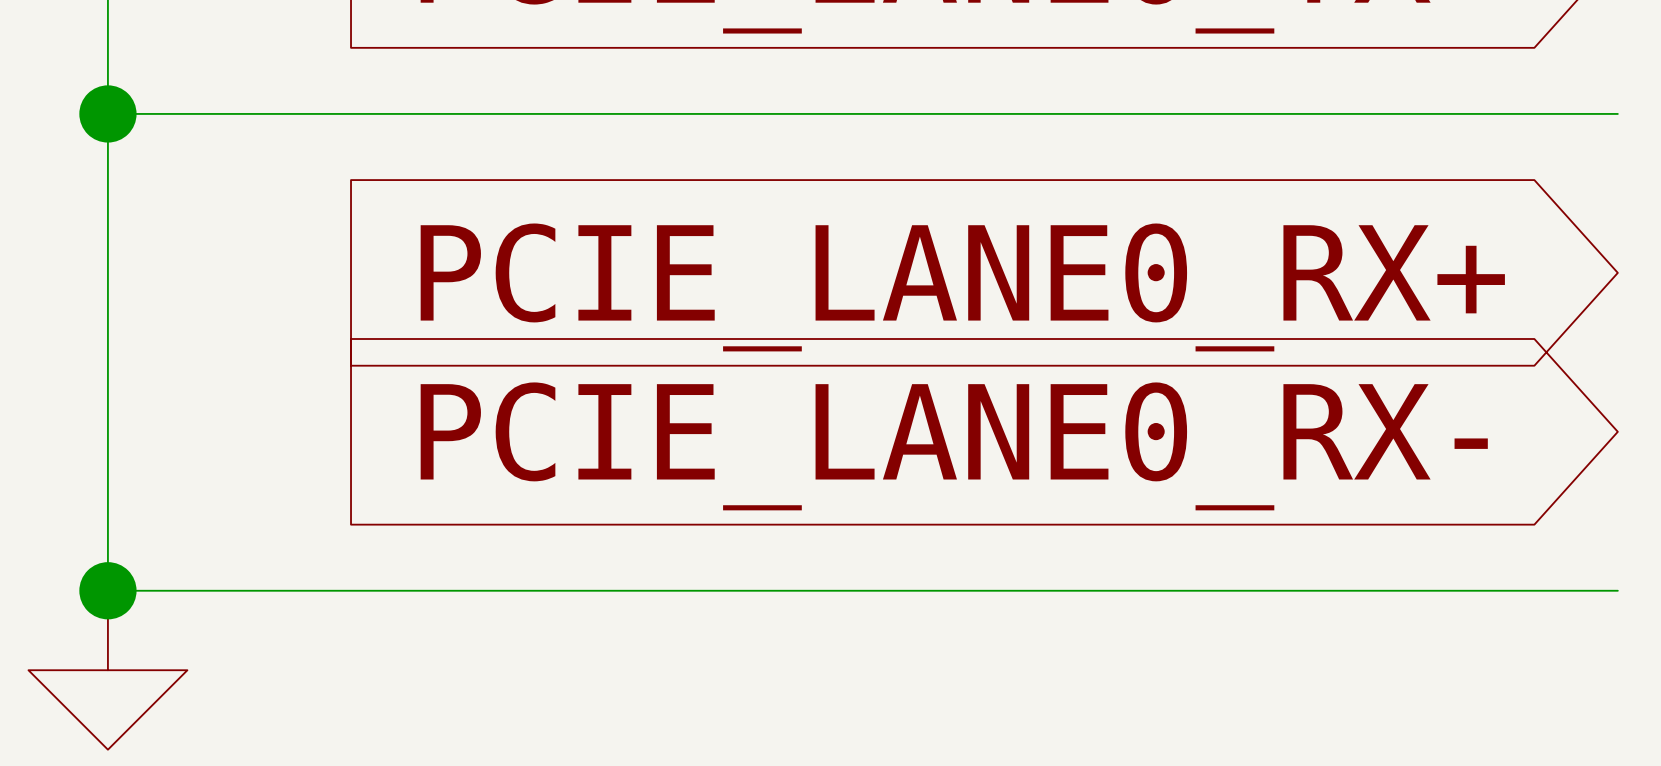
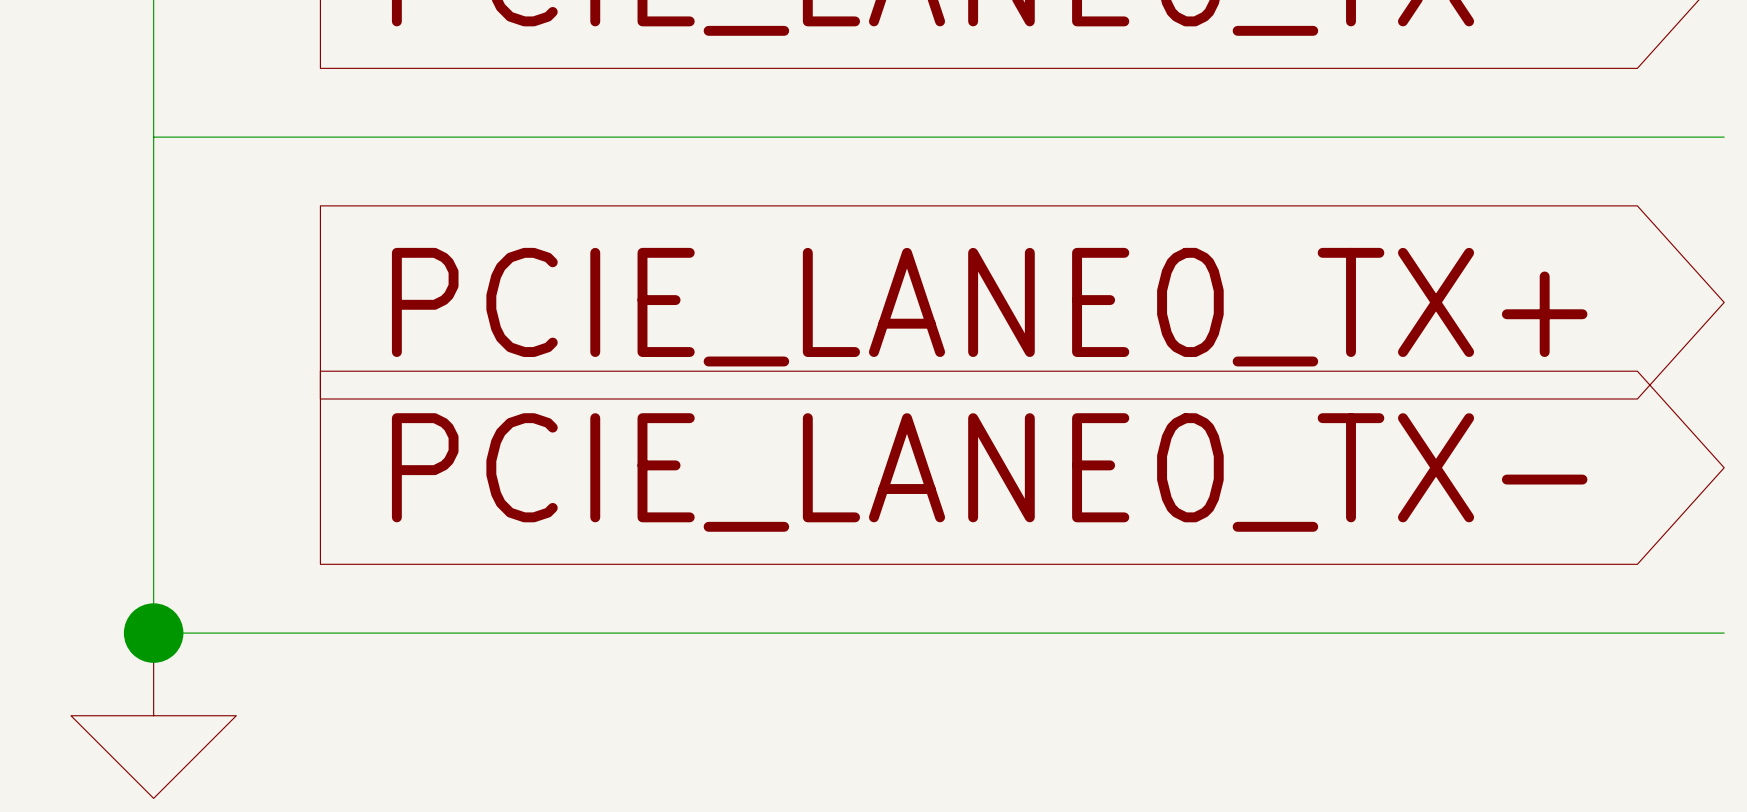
junction: (107, 113) -> none
global label: PCIE_LANE0_RX+ (962, 287) -> PCIE_LANE0_TX+ (989, 307)
global label: PCIE_LANE0_RX- (954, 446) -> PCIE_LANE0_TX- (989, 472)

